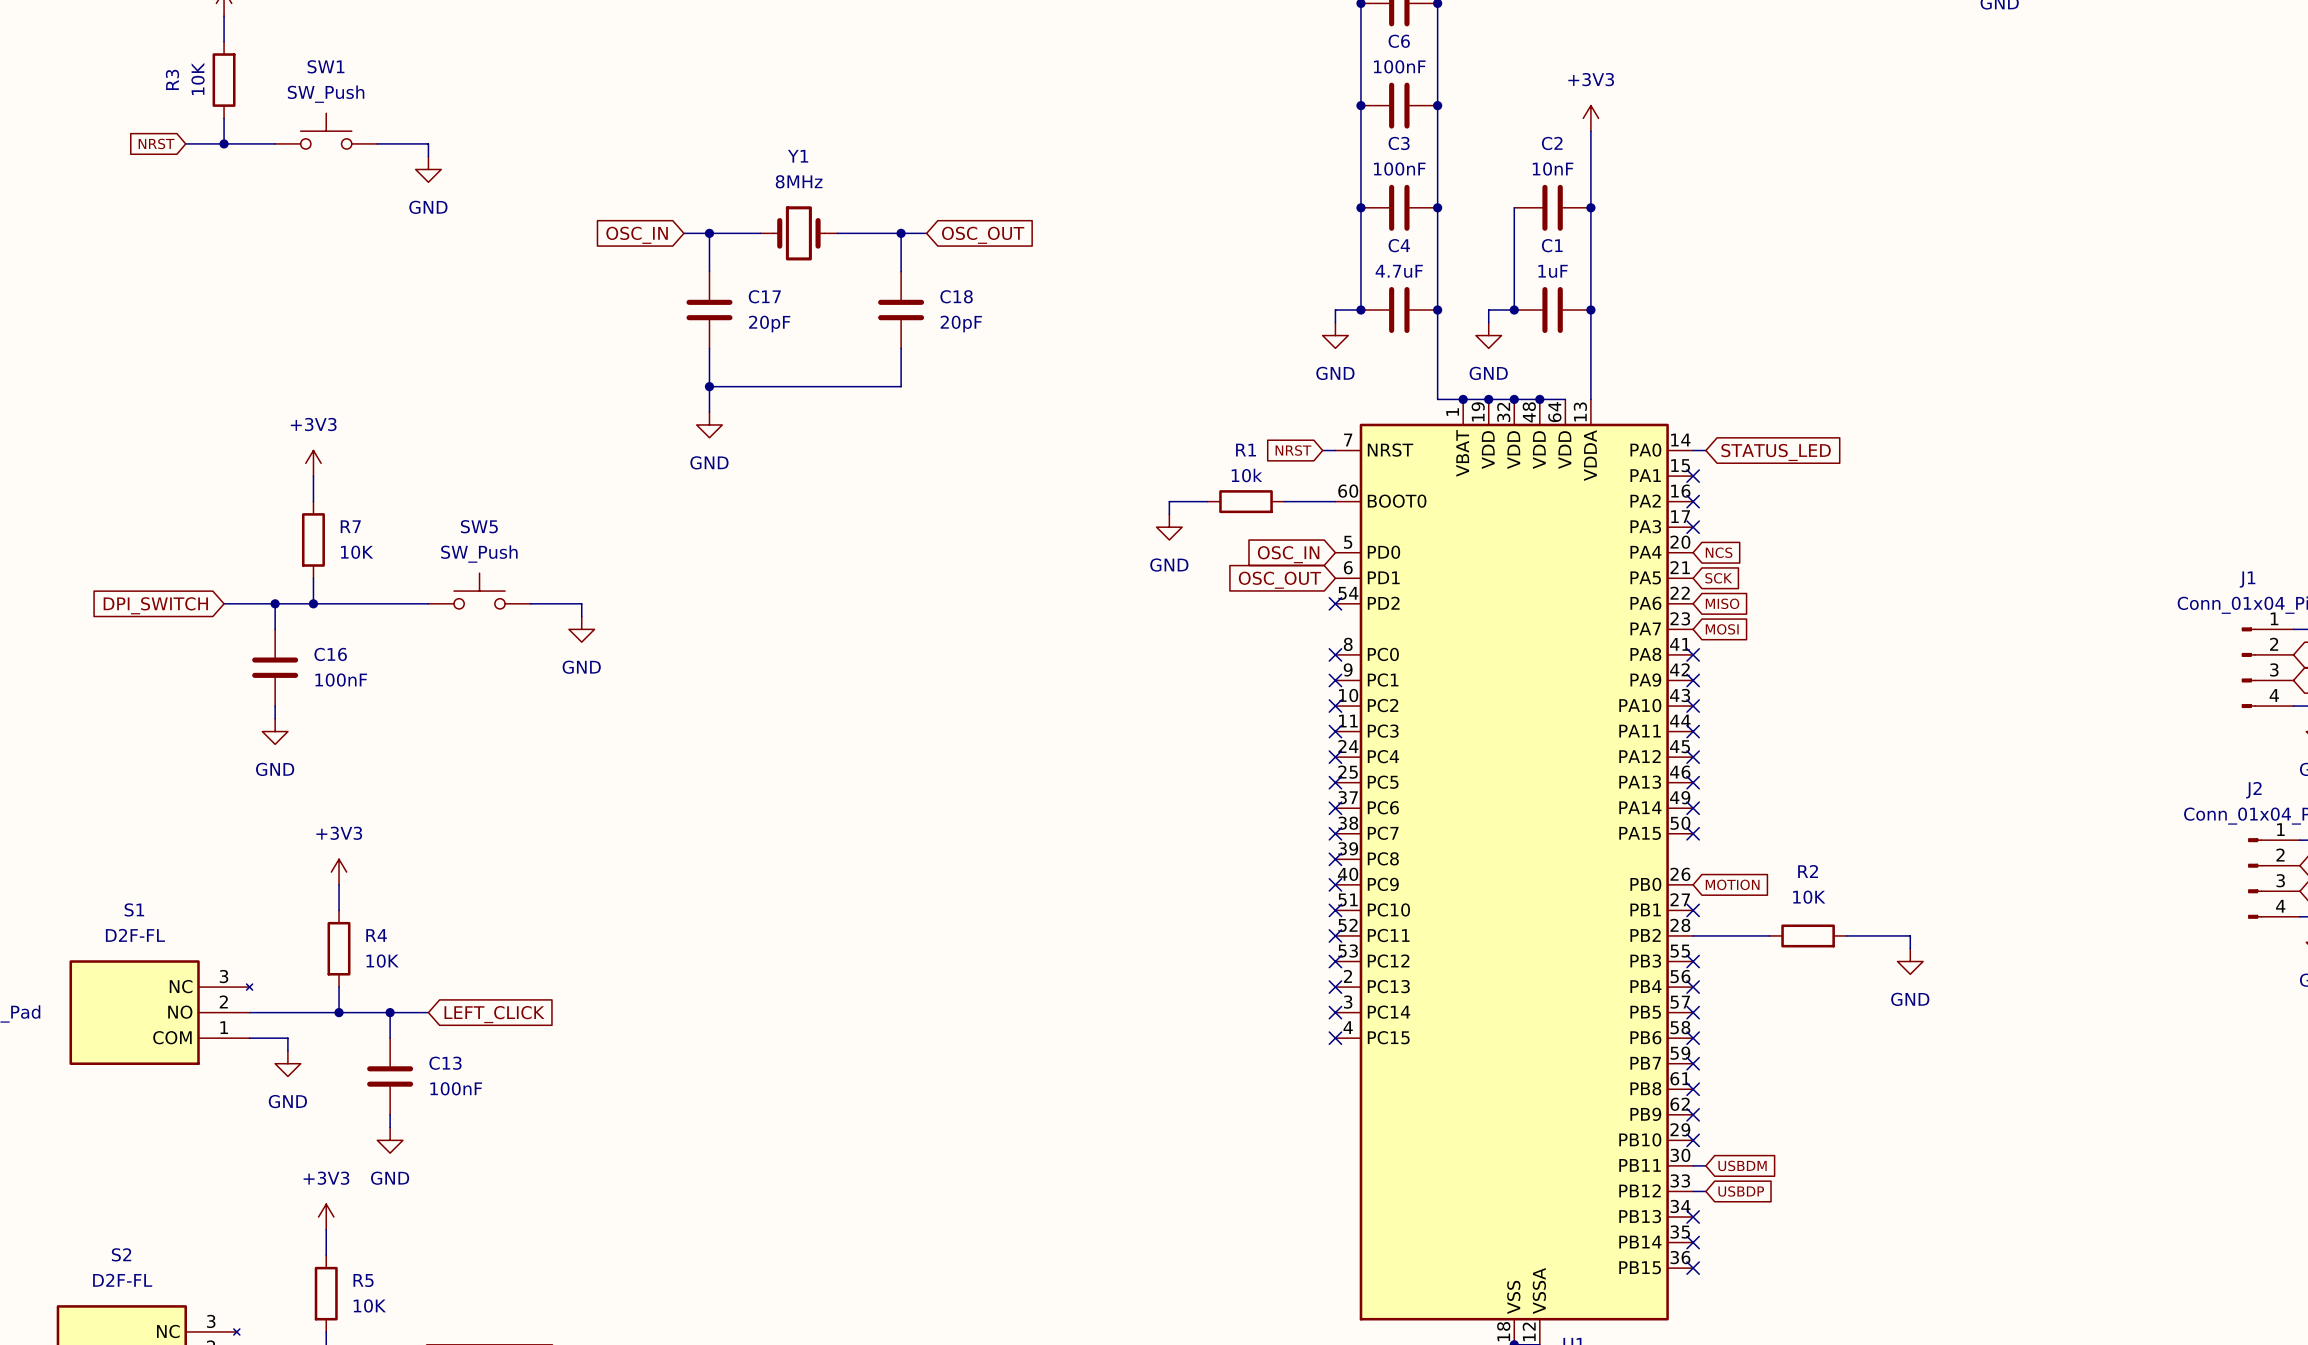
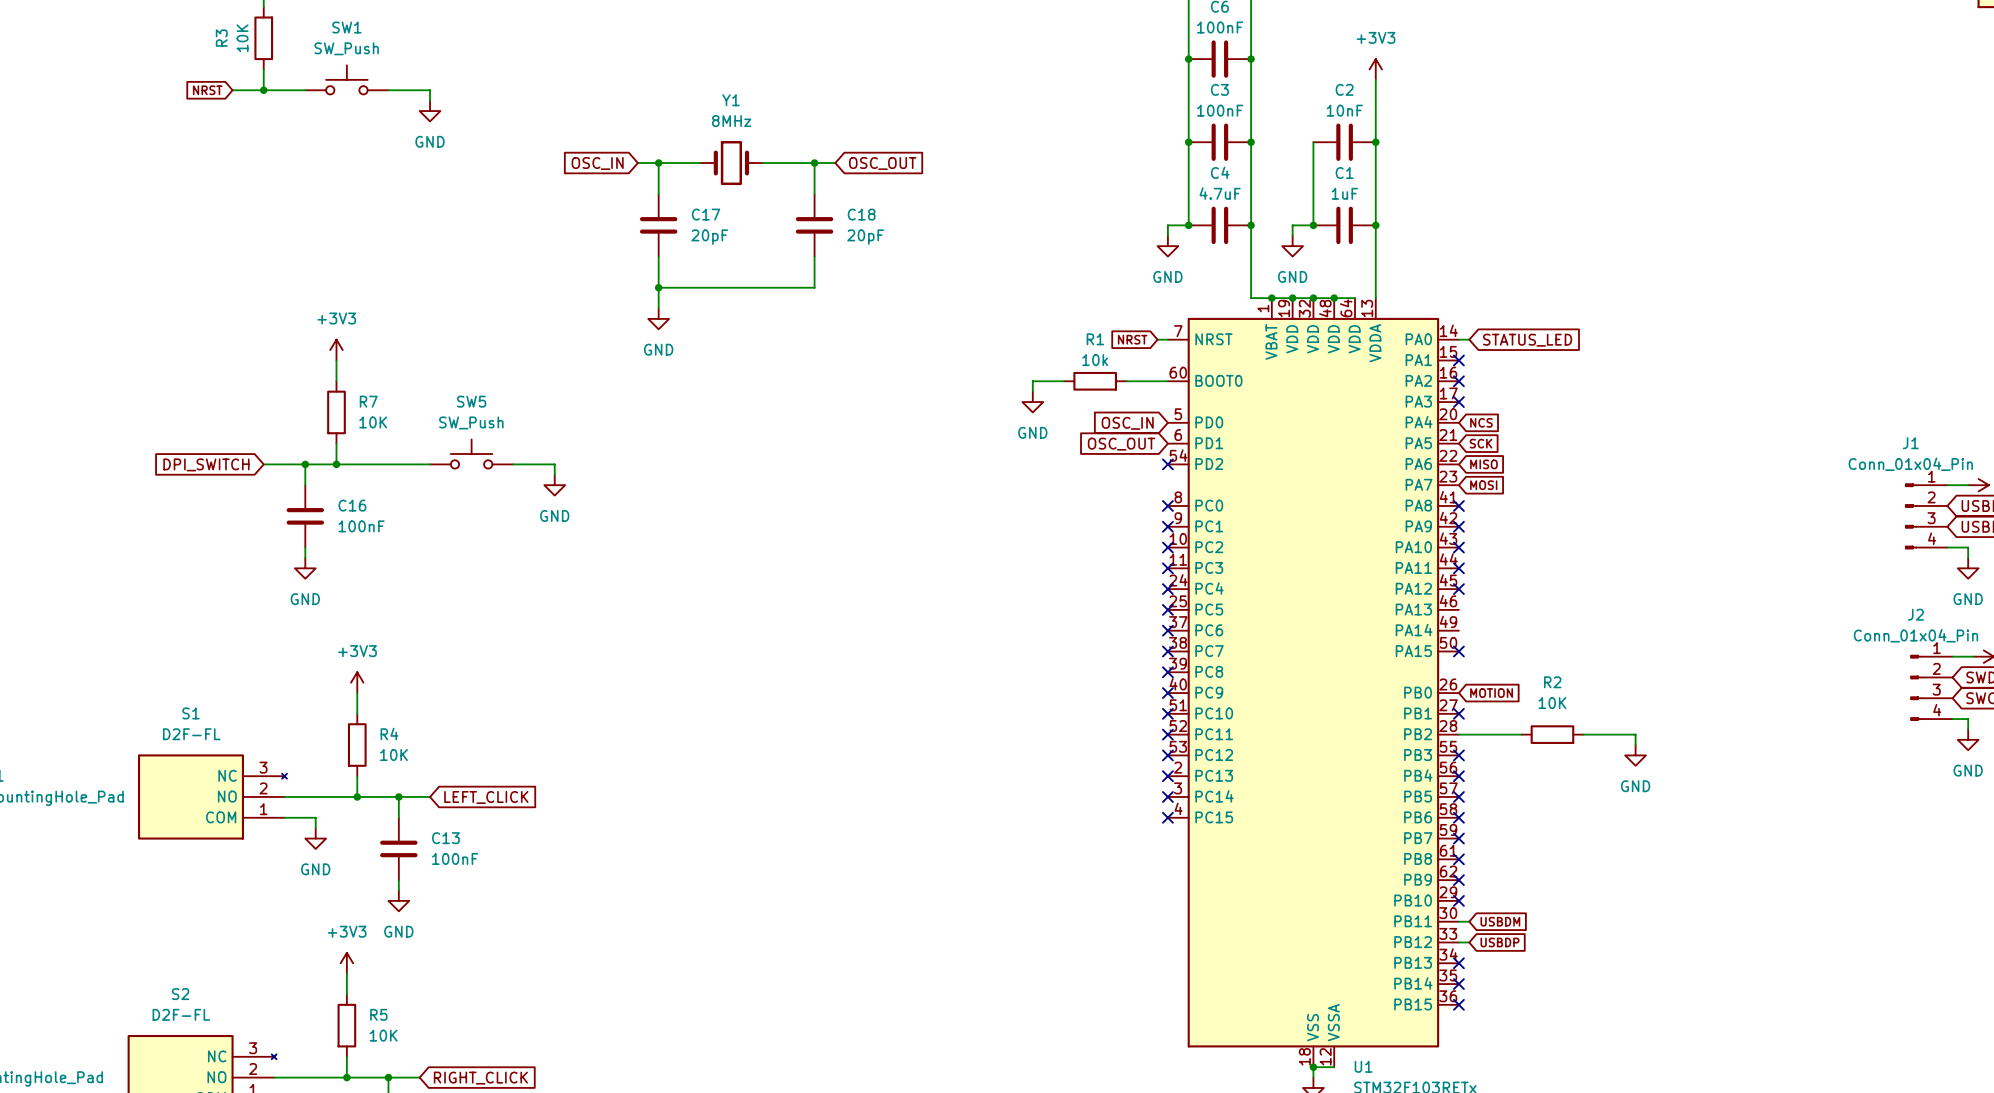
no-connect mark: (1693, 782) -> none
no-connect mark: (1693, 808) -> none

